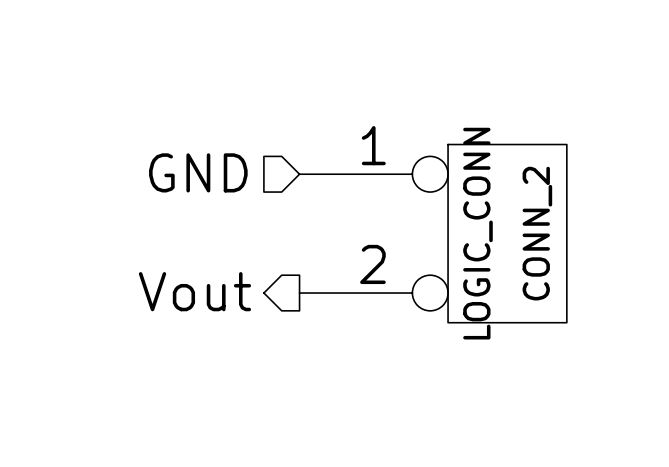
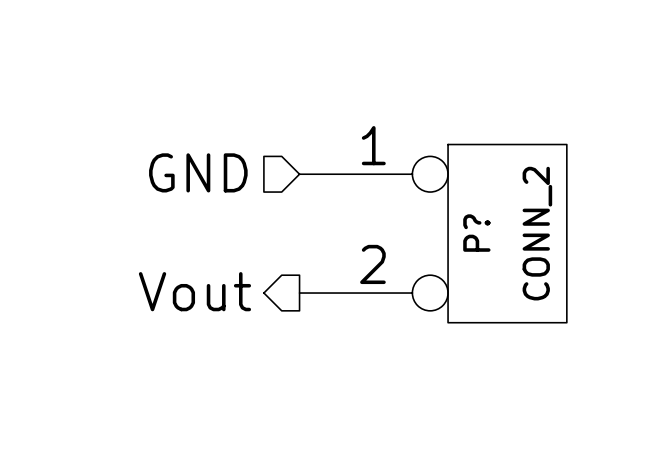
LOGIC_CONN name: LOGIC_CONN (477, 233) -> P? (476, 233)

